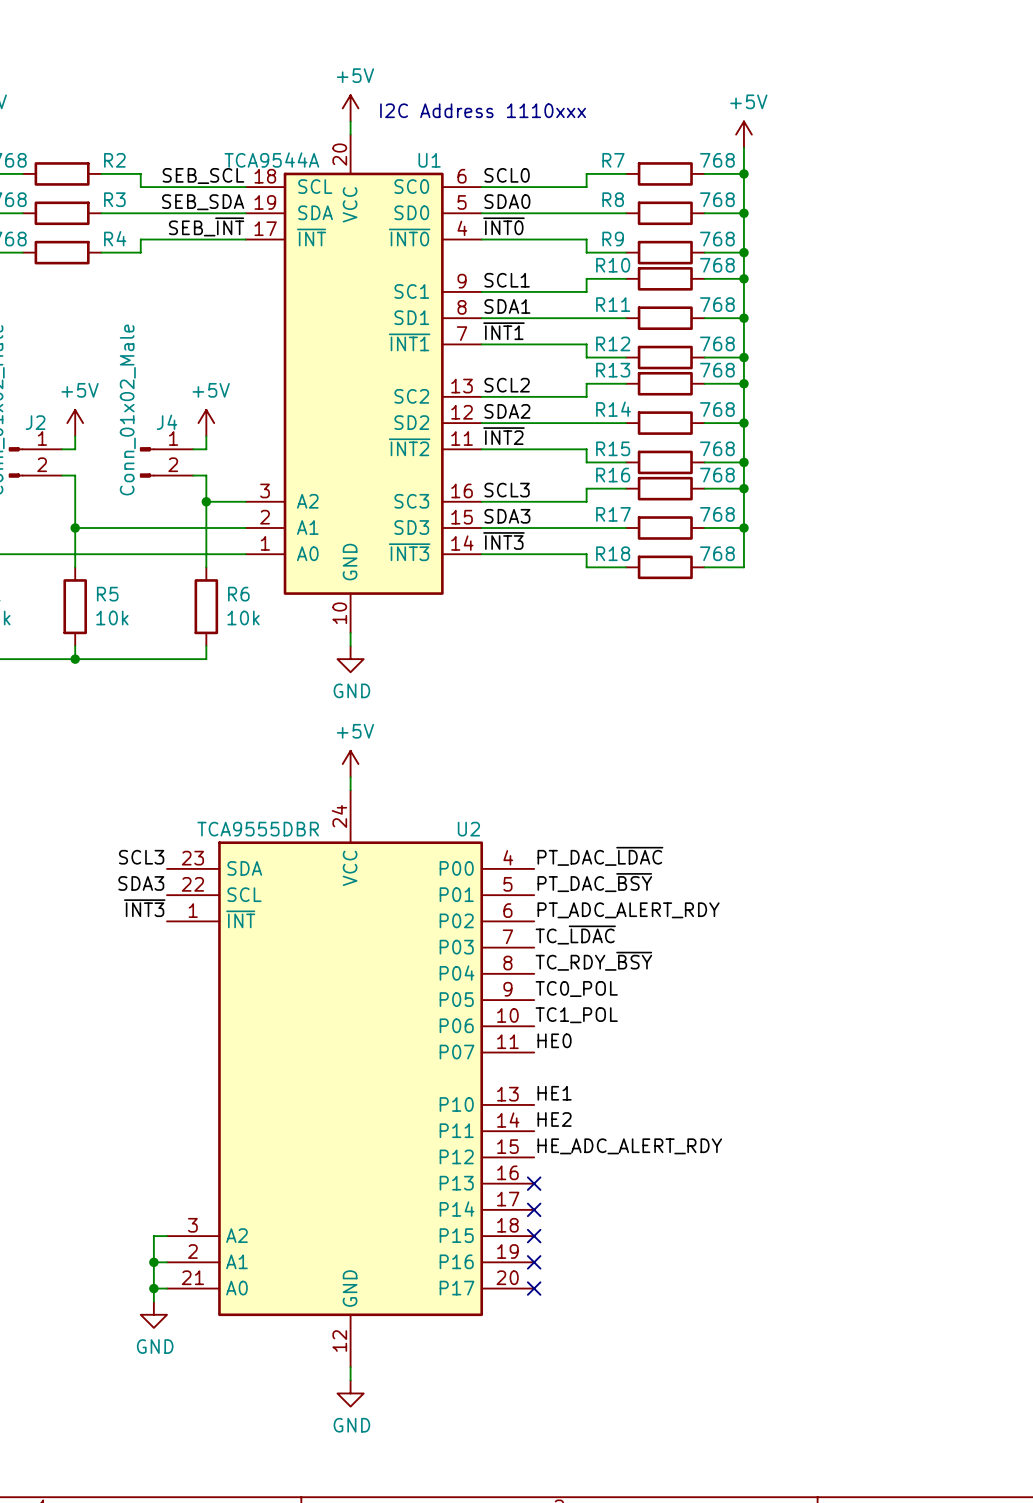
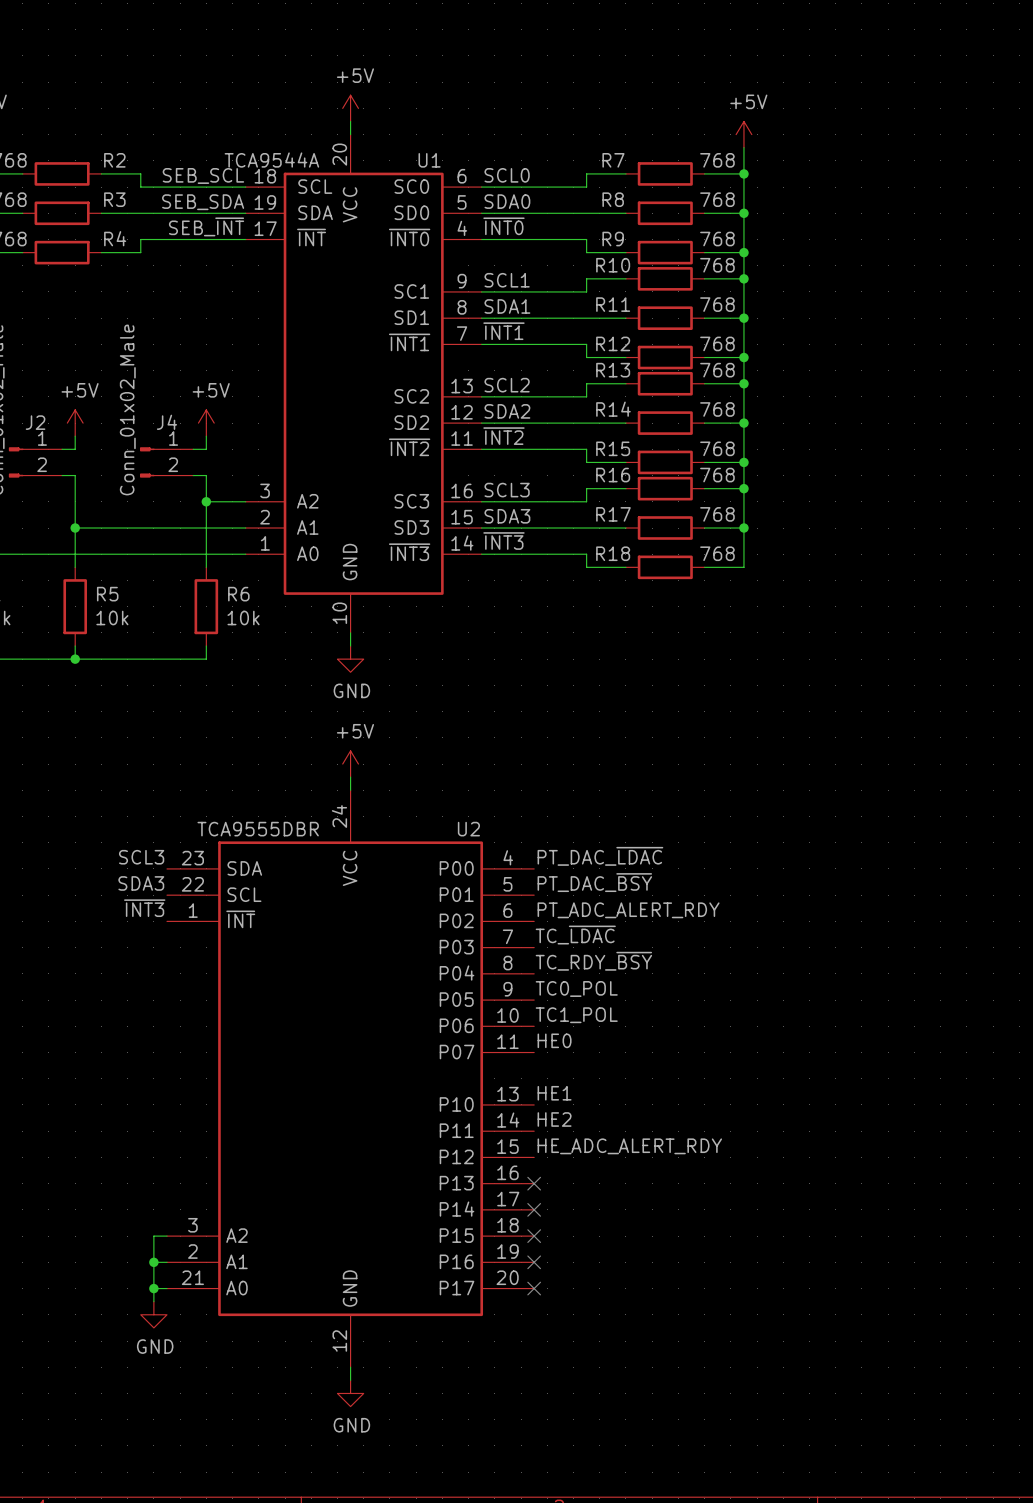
text: I2C Address 1110xxx (483, 110) -> none

